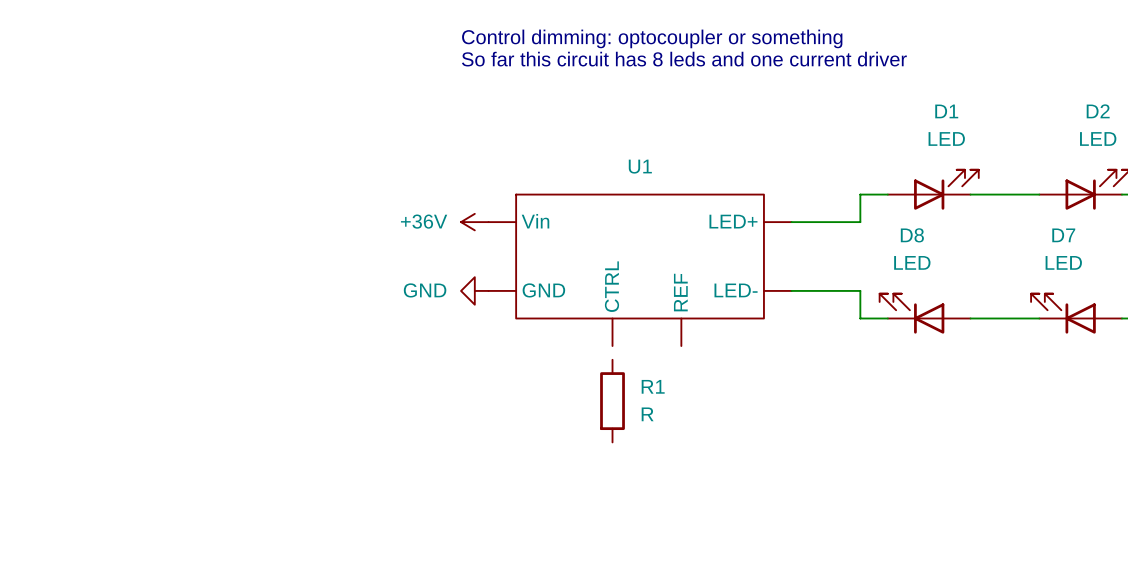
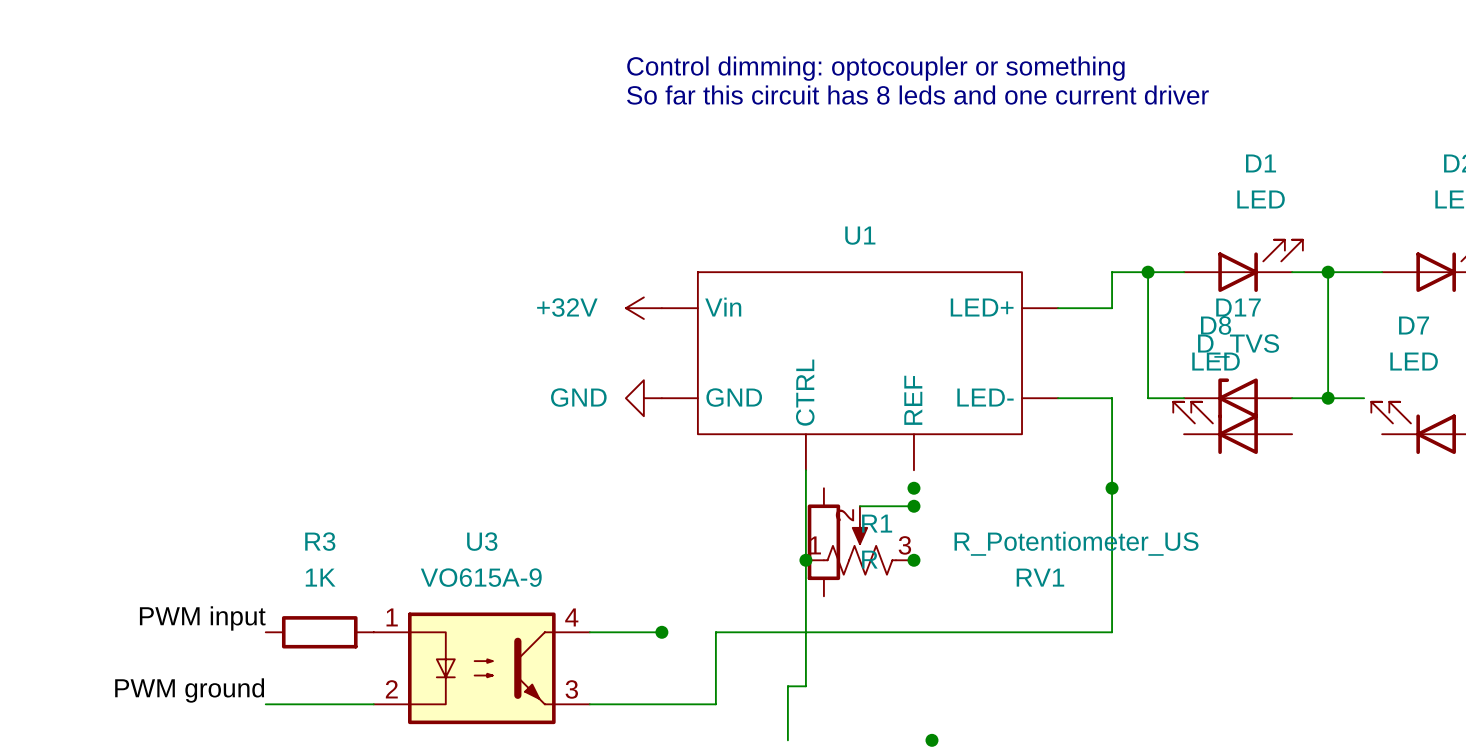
U1 symbol: [488, 194, 792, 347] -> [661, 272, 1059, 471]
junction: none -> (1148, 272)
wire: none -> (1328, 272) (1328, 398)
junction: none -> (1328, 272)
+32V: none -> (643, 308)
power symbol: +36V (474, 222) -> none
wire: (832, 222) (860, 222) -> (1112, 308) (1112, 272) (1148, 272)
wire: none -> (1148, 308) (1148, 398) (1184, 398)
wire: (832, 290) (860, 290) (860, 318) (887, 318) -> (1112, 398) (1112, 632) (715, 632) (715, 704) (589, 704)
D17: none -> D_TVS (1238, 398)
wire: none -> (1292, 398) (1364, 398)
junction: none -> (1328, 398)
wire: (970, 318) (1039, 318) -> none
wire: none -> (805, 470) (805, 686) (787, 686) (787, 740)
junction: none -> (913, 488)
junction: none -> (1112, 488)
wire: none -> (859, 506) (913, 506)
junction: none -> (913, 506)
RV1: none -> R_Potentiometer_US (859, 540)
junction: none -> (805, 560)
junction: none -> (913, 560)
label: none -> PWM input (202, 618)
R3: none -> 1K (319, 632)
wire: none -> (589, 632) (661, 632)
junction: none -> (661, 632)
U3: none -> VO615A-9 (481, 668)
label: none -> PWM ground (189, 690)
wire: none -> (265, 704) (373, 704)
junction: none -> (931, 740)

